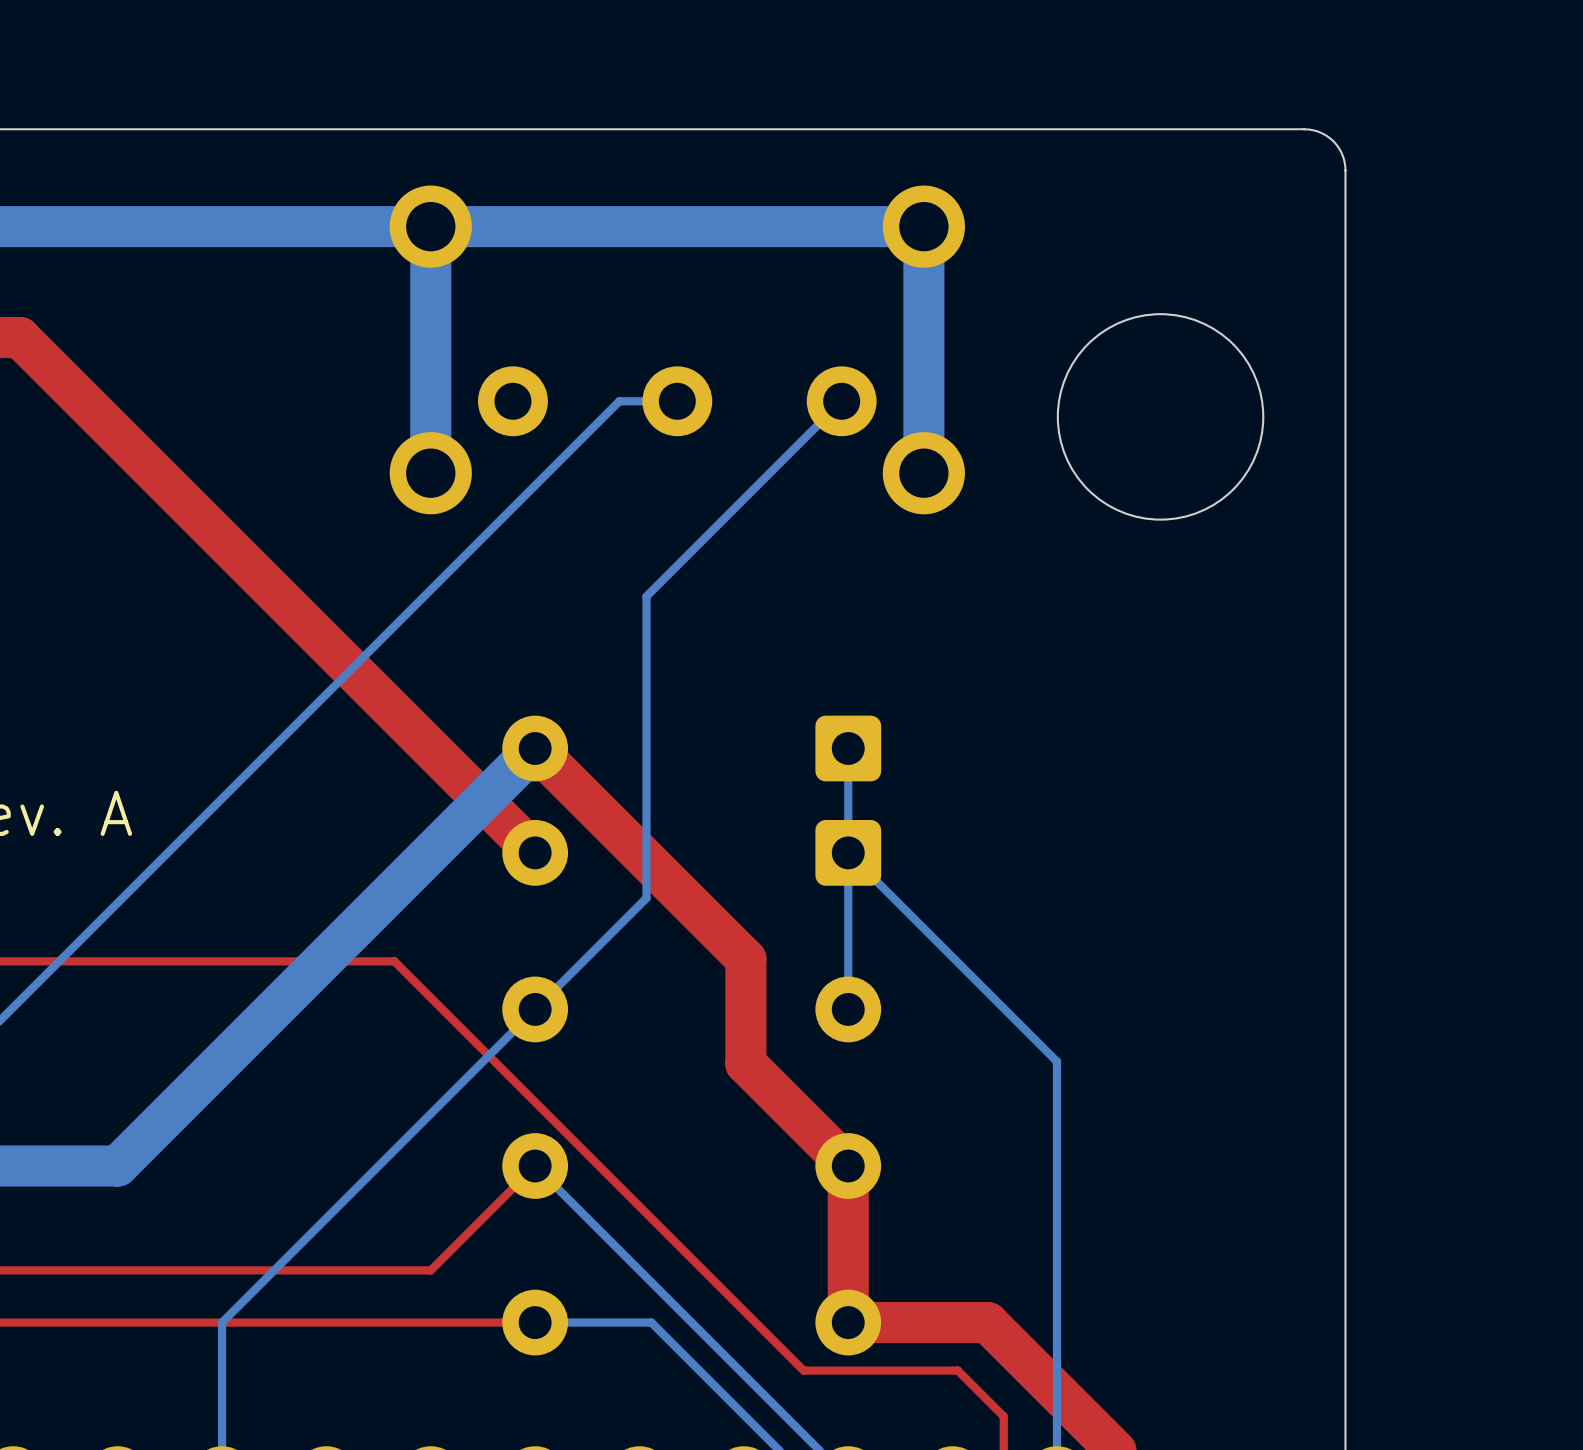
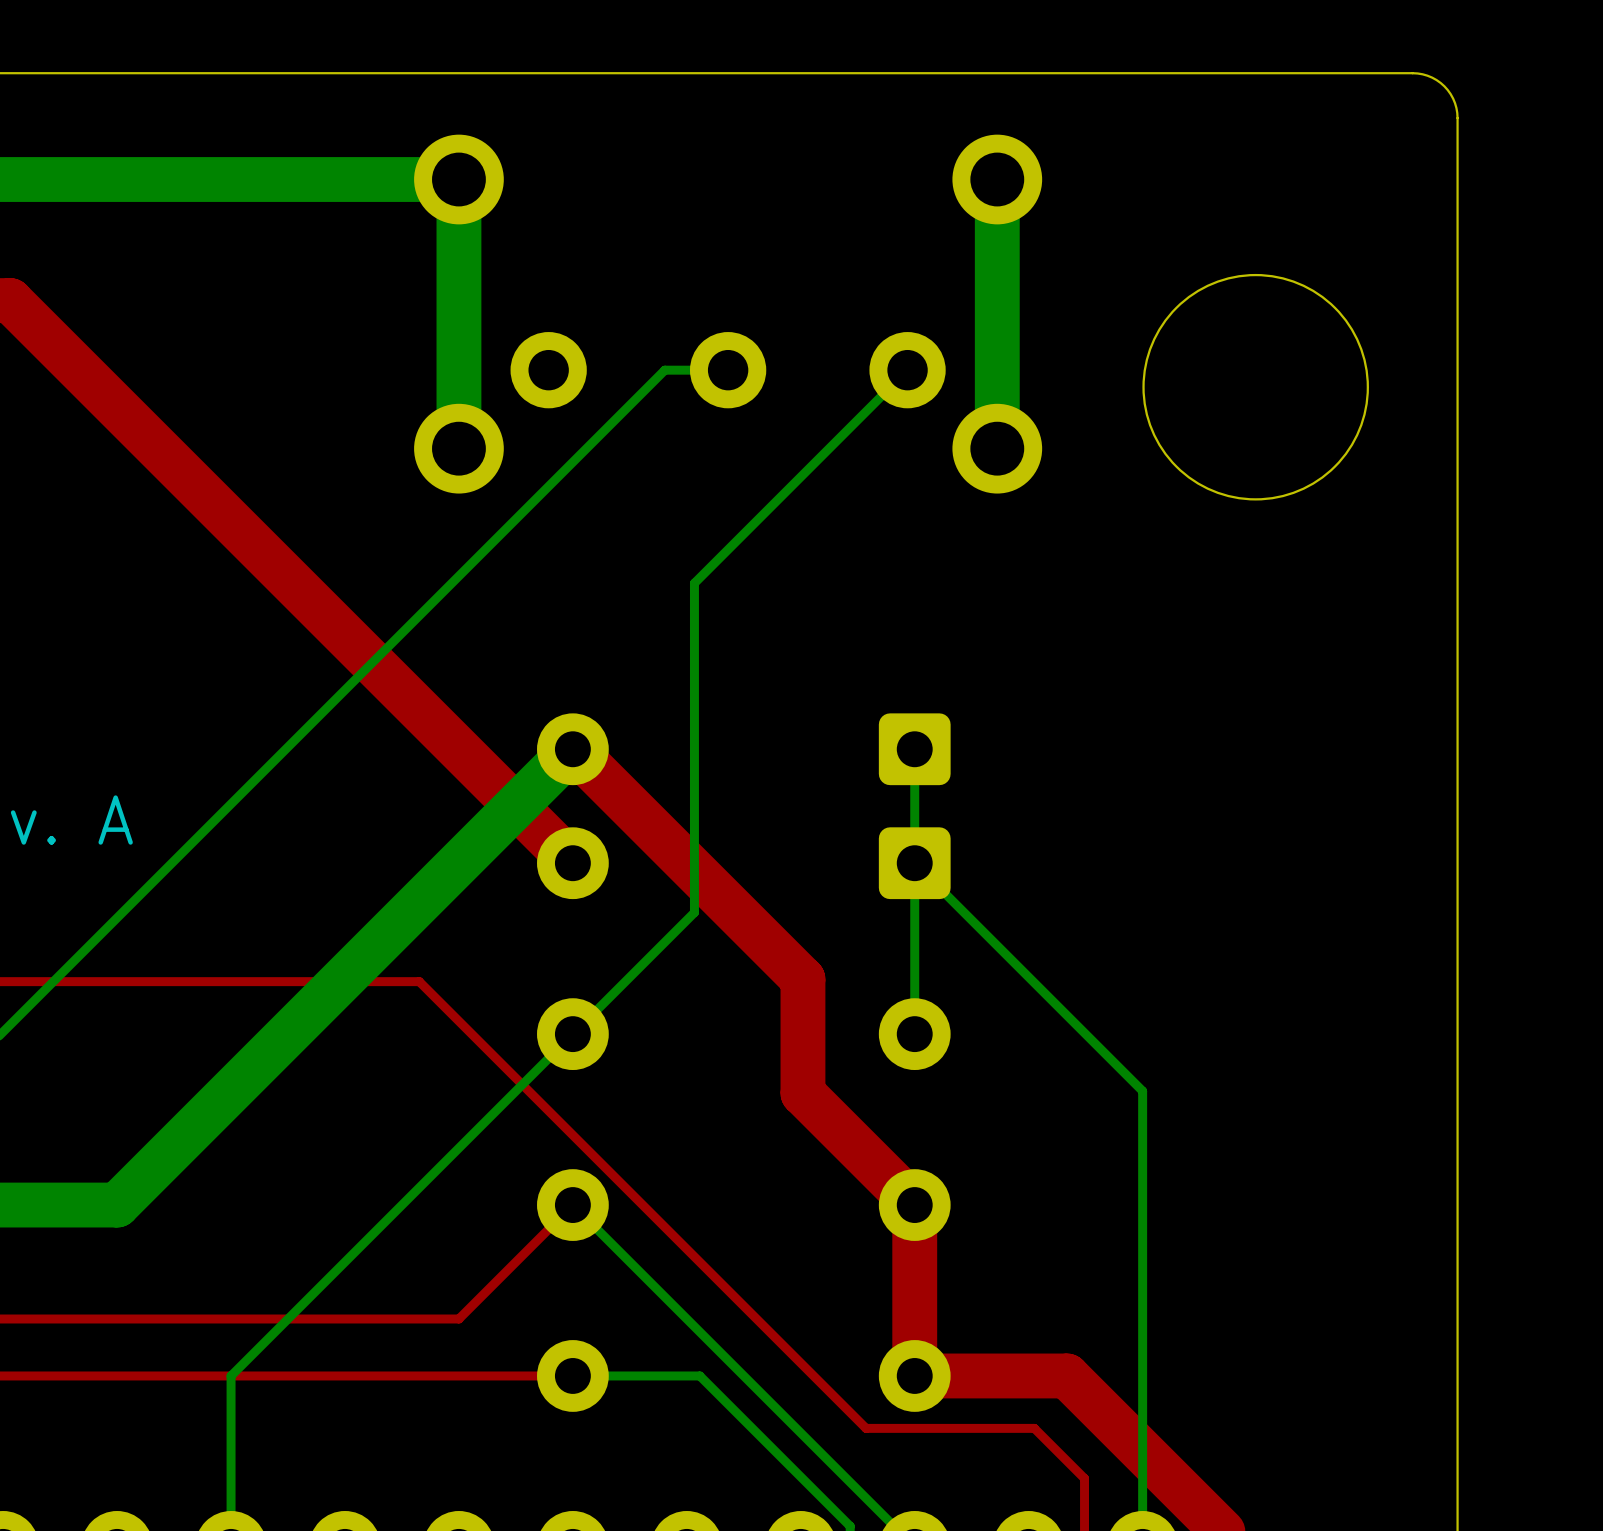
bottom track: (923, 226) (430, 226) -> none

